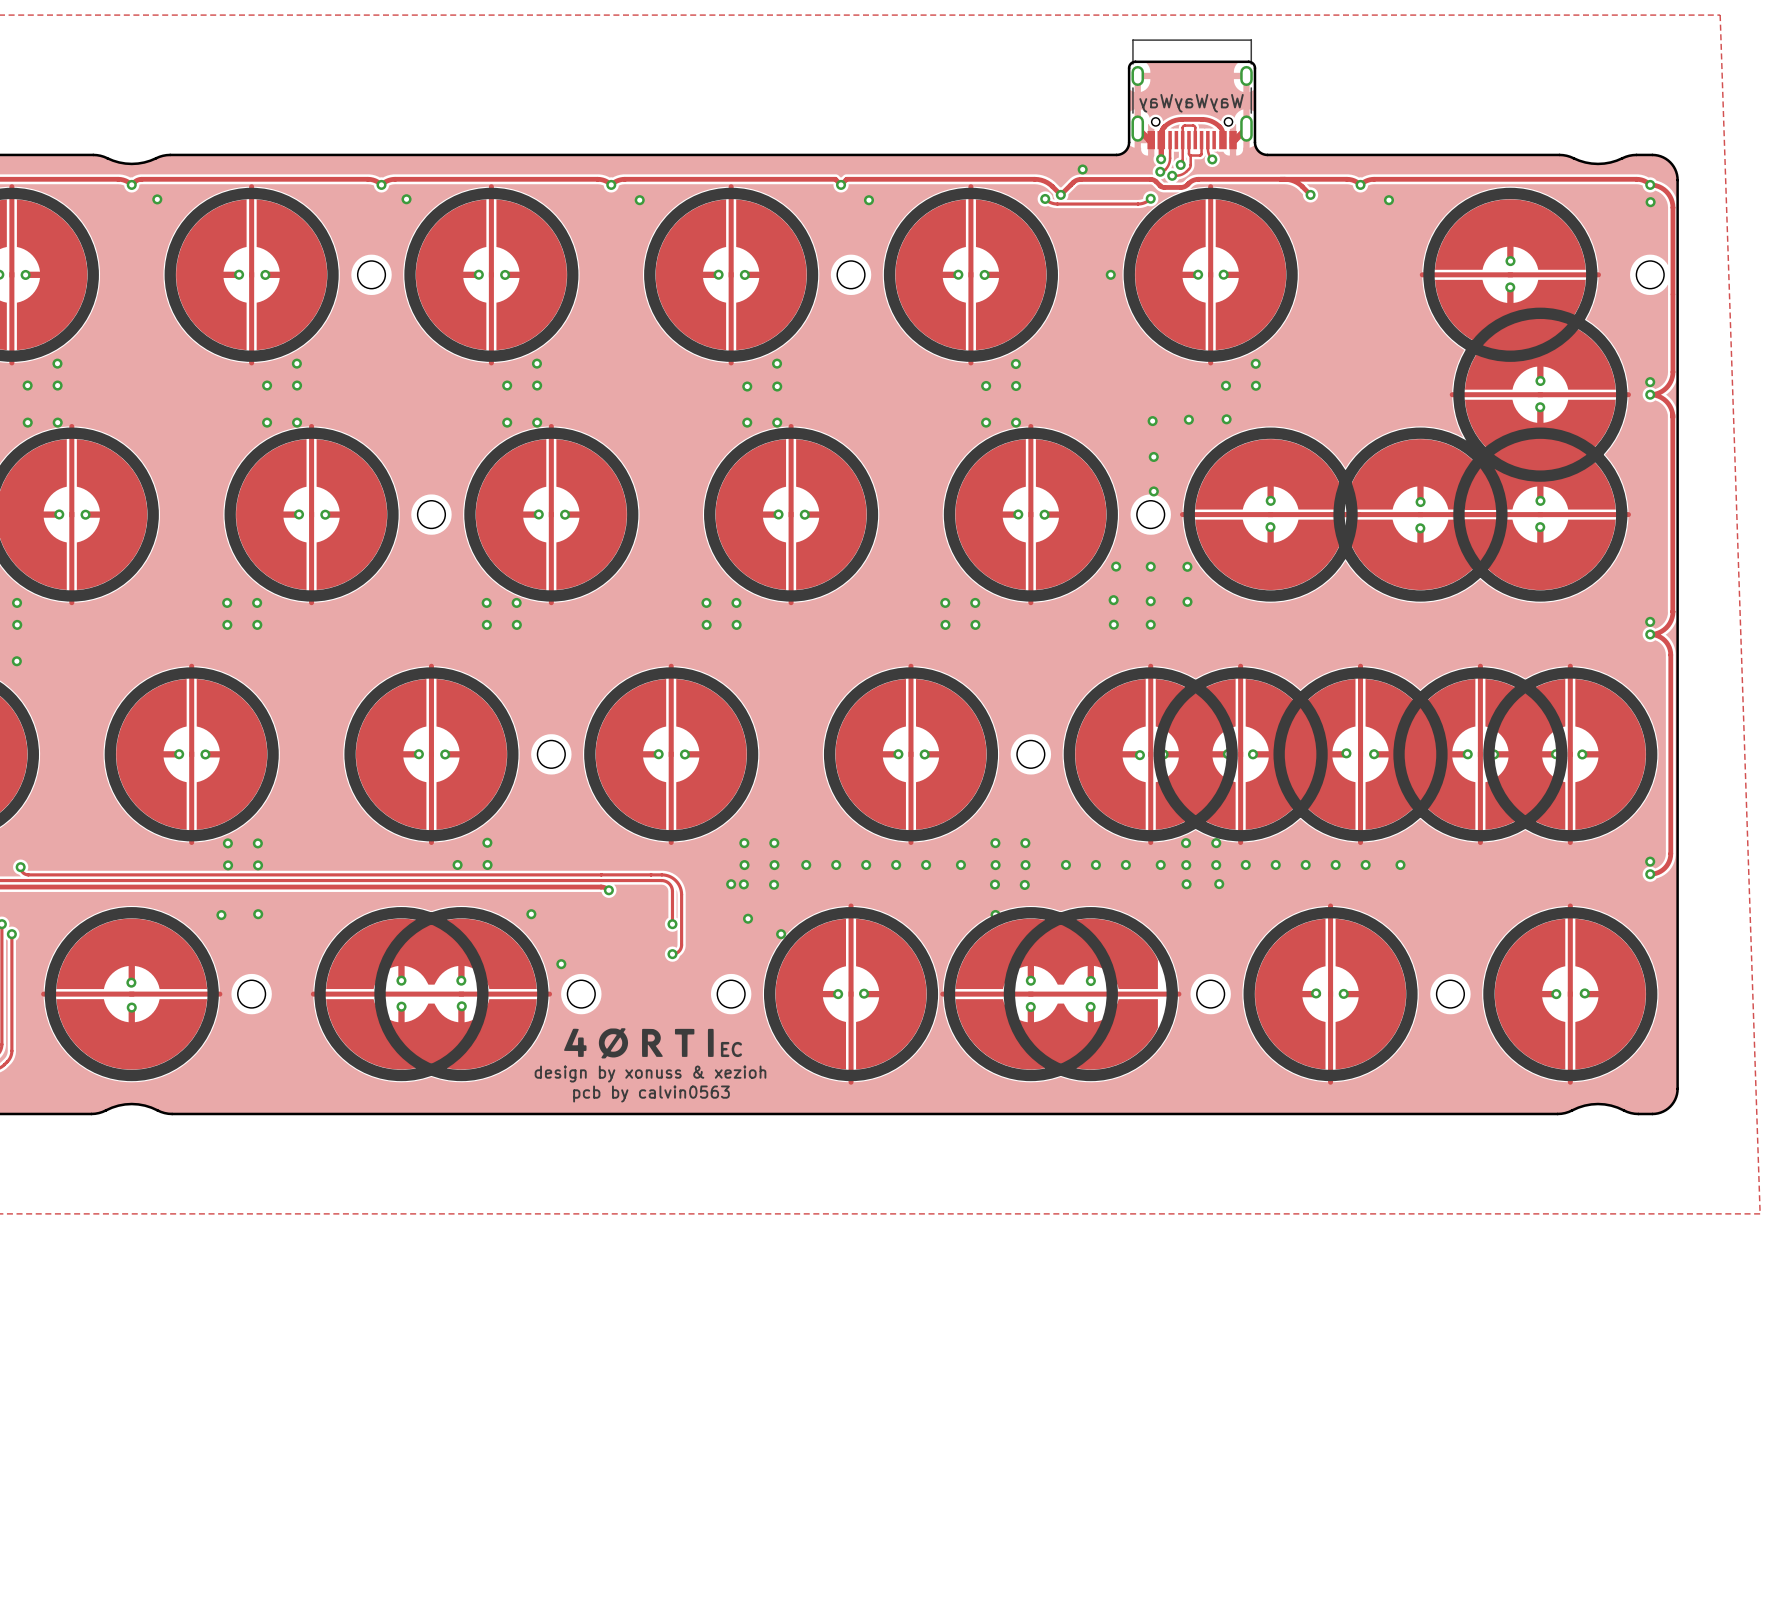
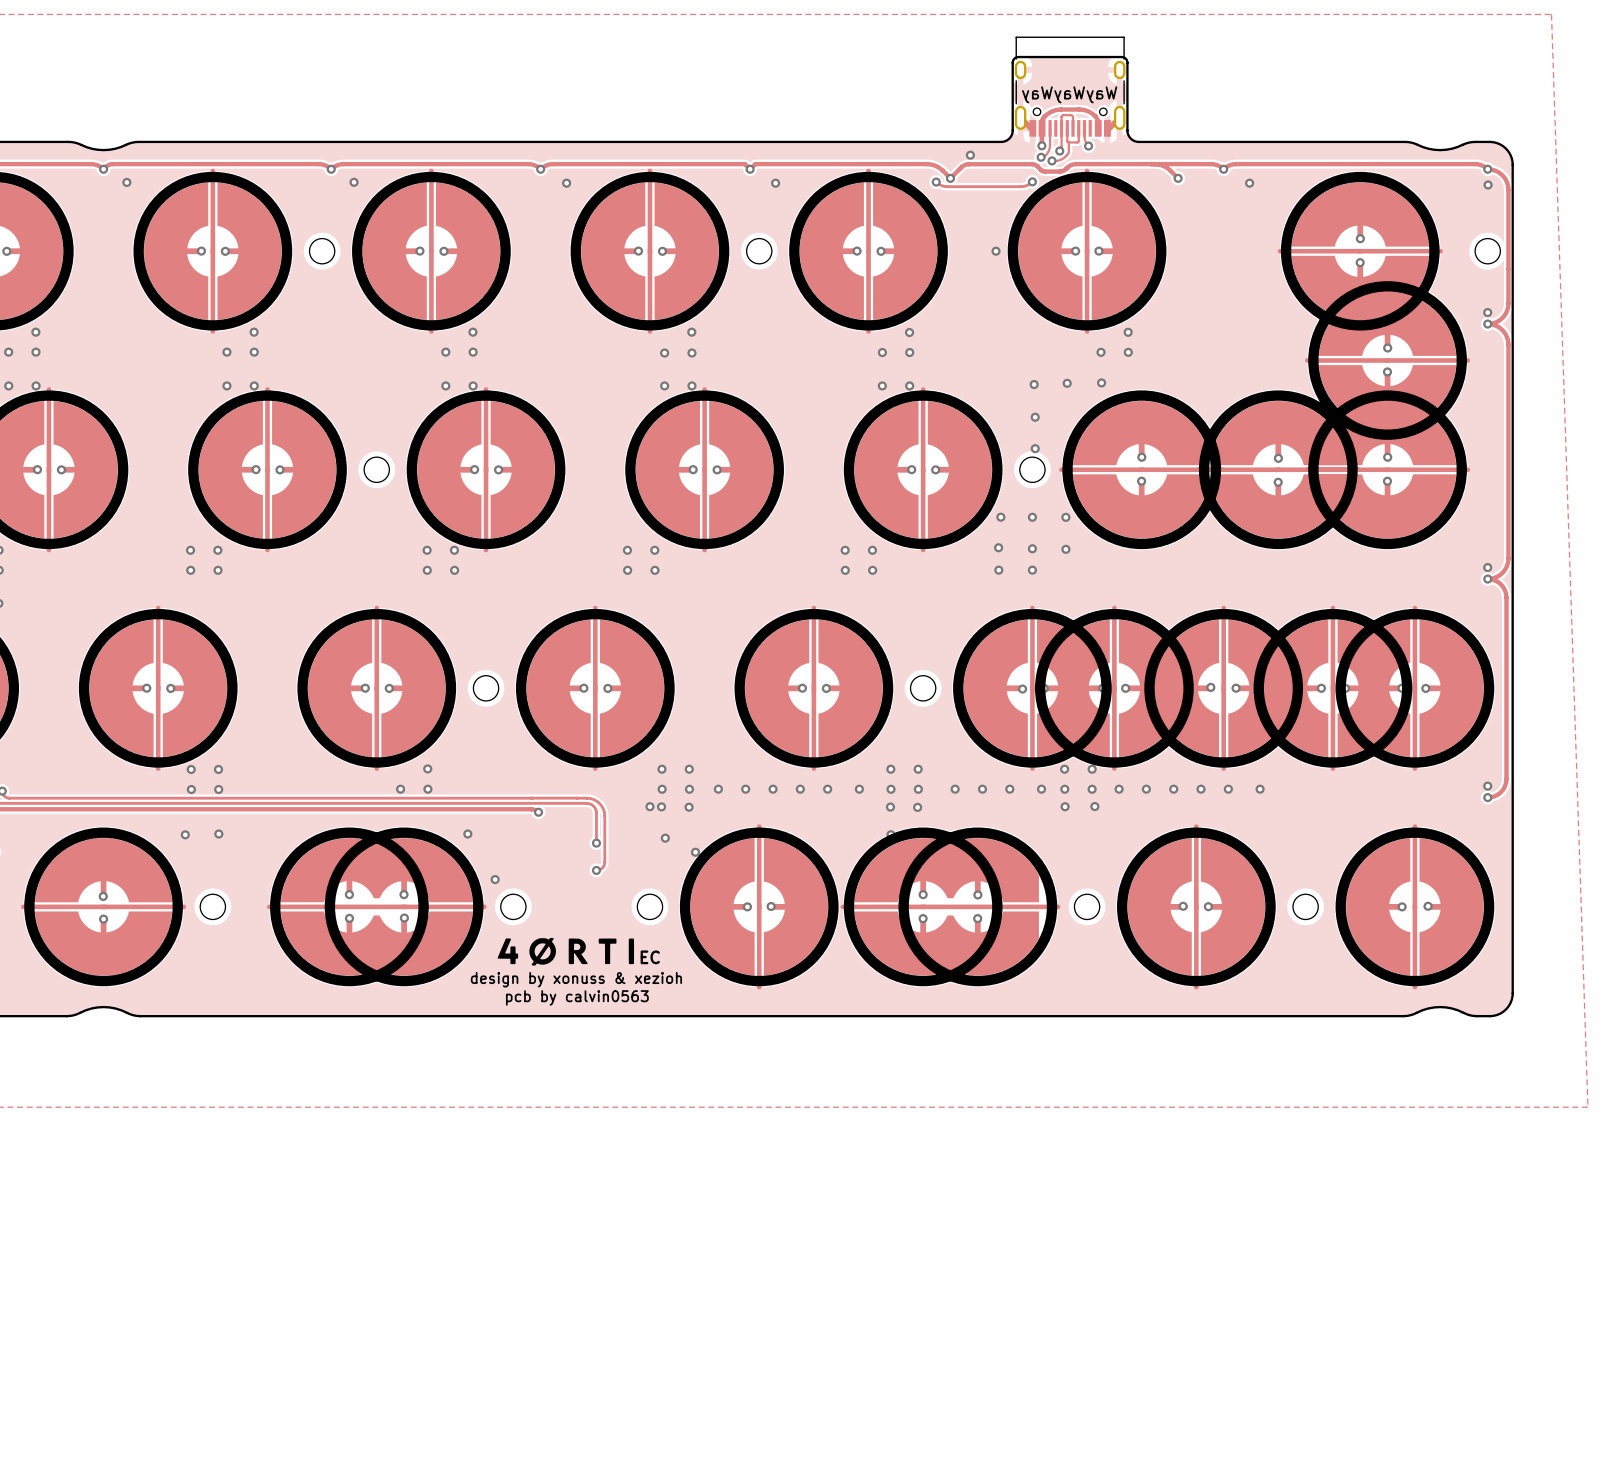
track: (1672, 332) (1671, 379) (1662, 391) (1650, 394) (1658, 396) (1666, 401) (1671, 408) (1672, 417) -> none
via: none -> (1487, 312)
via: none -> (1487, 324)
via: (1650, 382) -> none
via: (1650, 394) -> none
track: (1672, 414) (1672, 611) -> (1508, 303) (1506, 312) (1502, 317) (1494, 322) (1487, 324) (1500, 328) (1505, 334) (1508, 342) (1508, 558)

